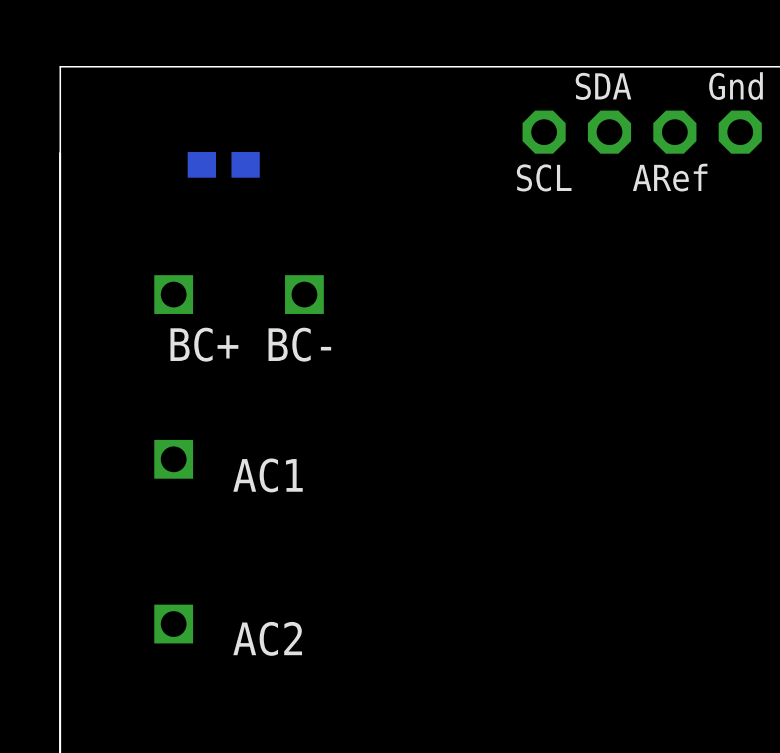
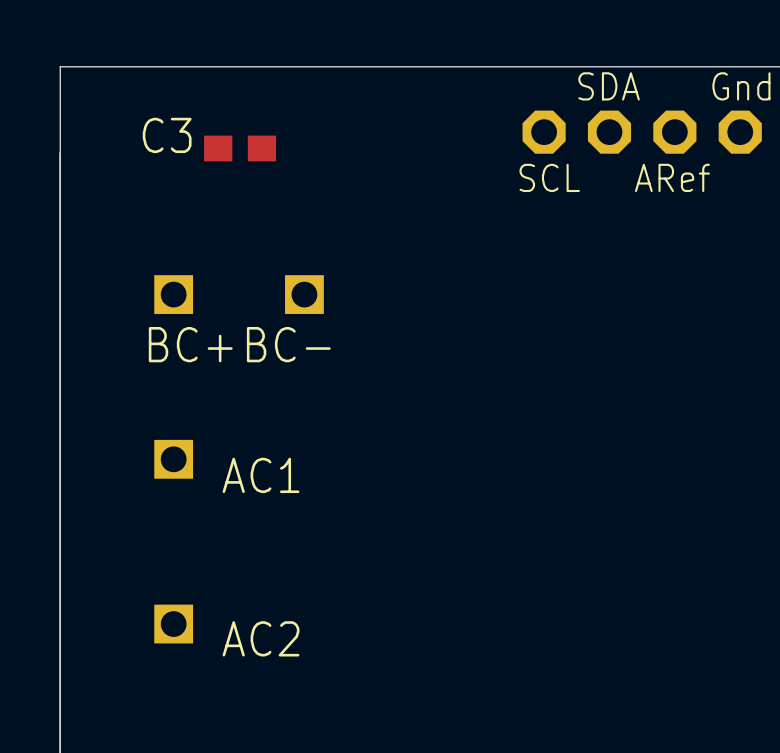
C3 side: bottom (223, 164) -> top (240, 148)

